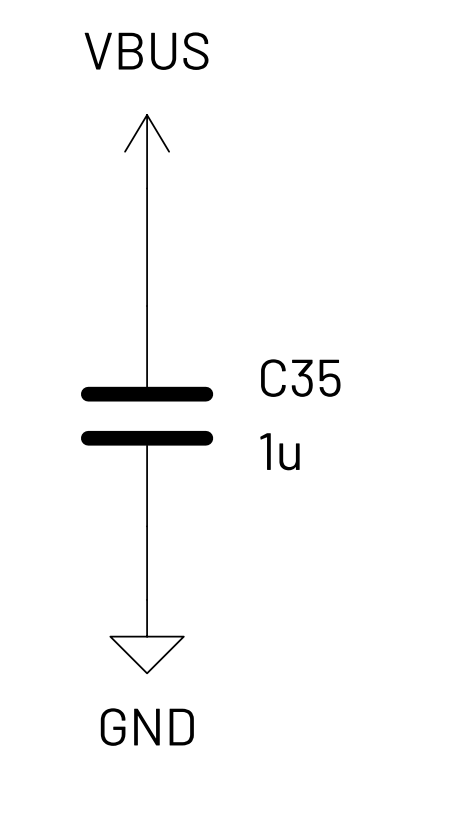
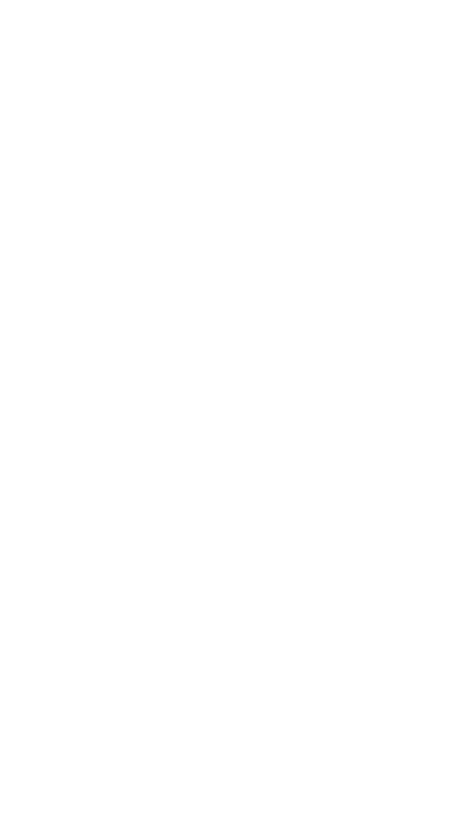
power symbol: VBUS (147, 151) -> none
wire: (147, 188) (147, 306) -> none
C35: 1u (147, 416) -> none
wire: (147, 526) (147, 599) -> none
power symbol: GND (147, 636) -> none

